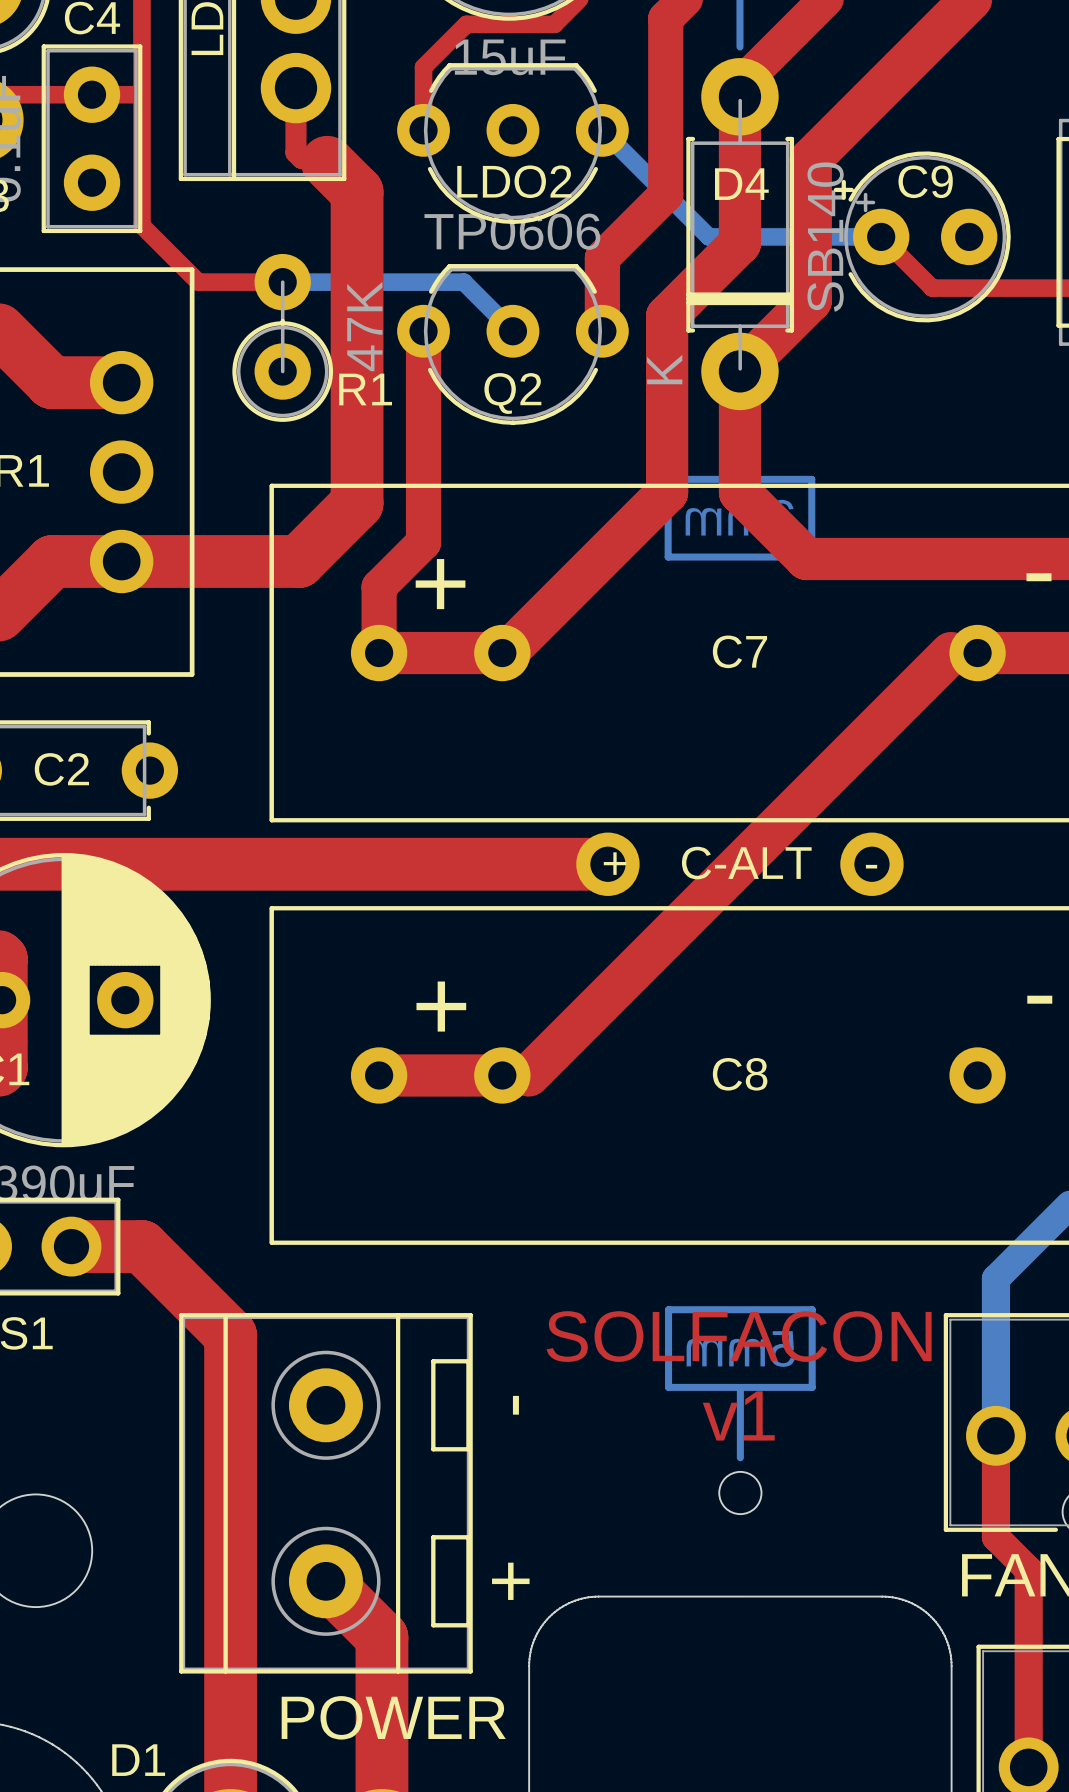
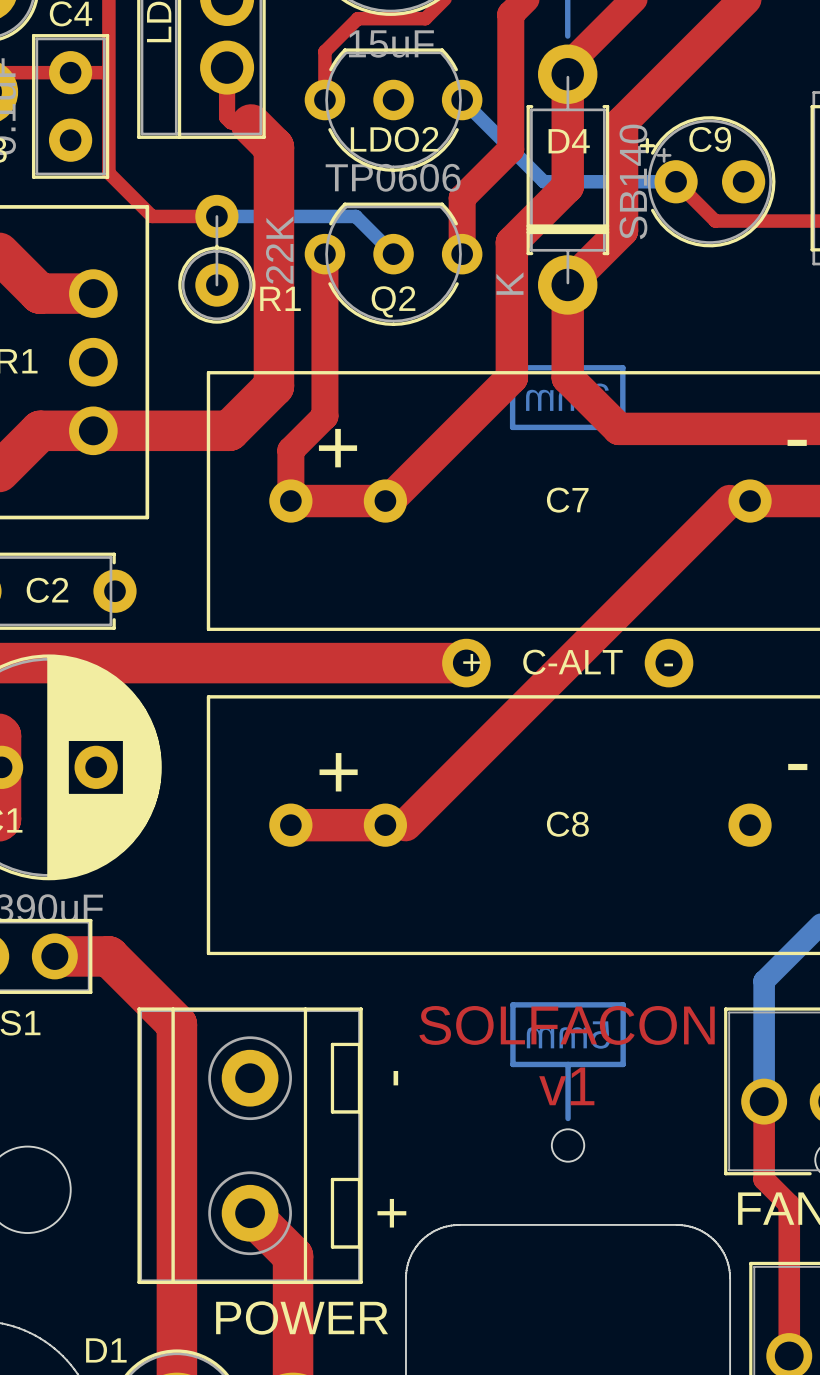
R1 value: 47K (364, 326) -> 22K (279, 250)

